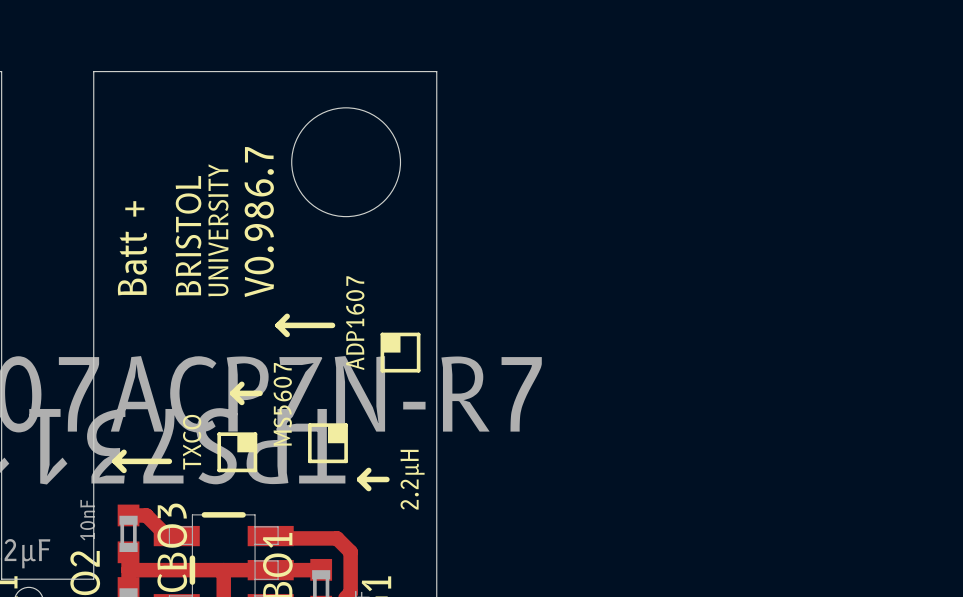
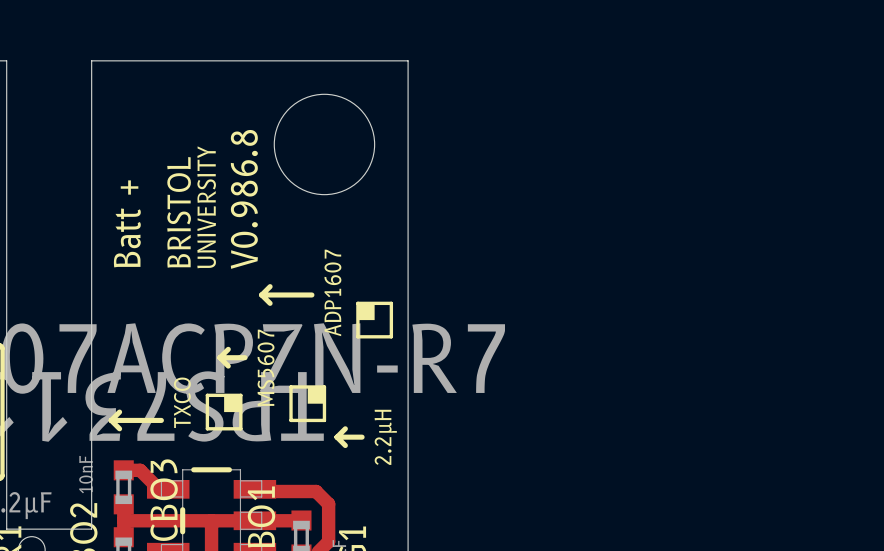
text: V0.986.7 (259, 222) -> V0.986.8 (244, 199)

